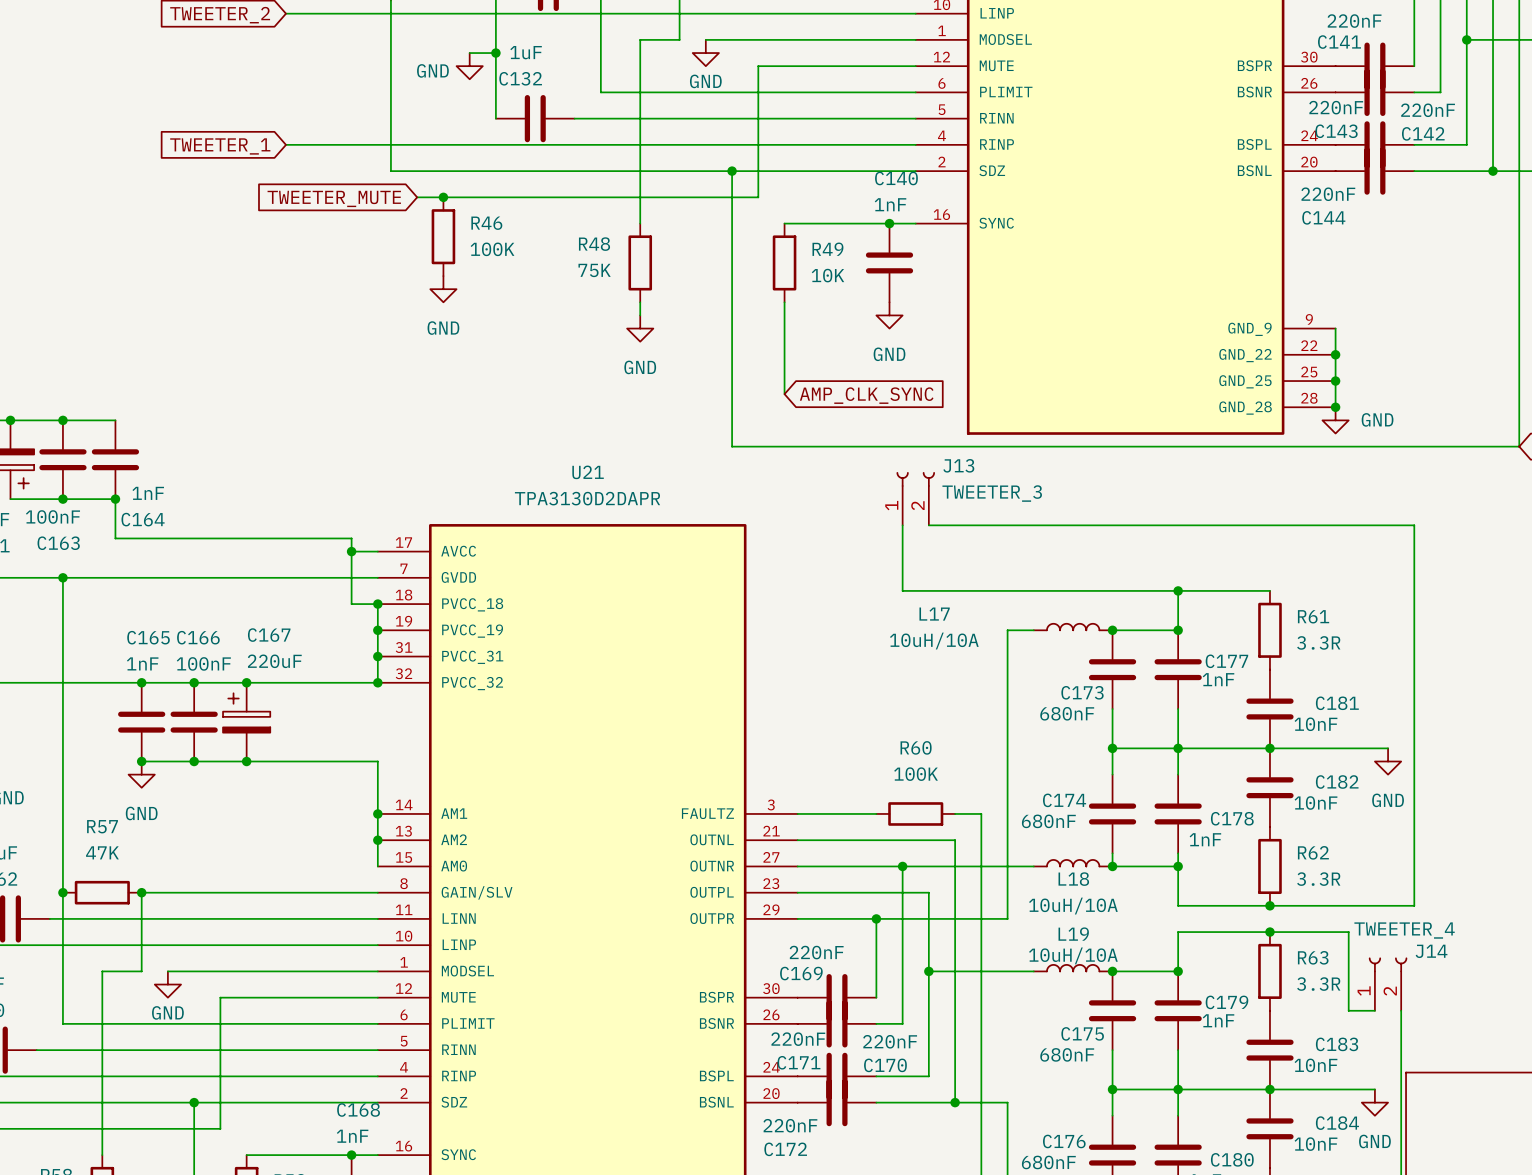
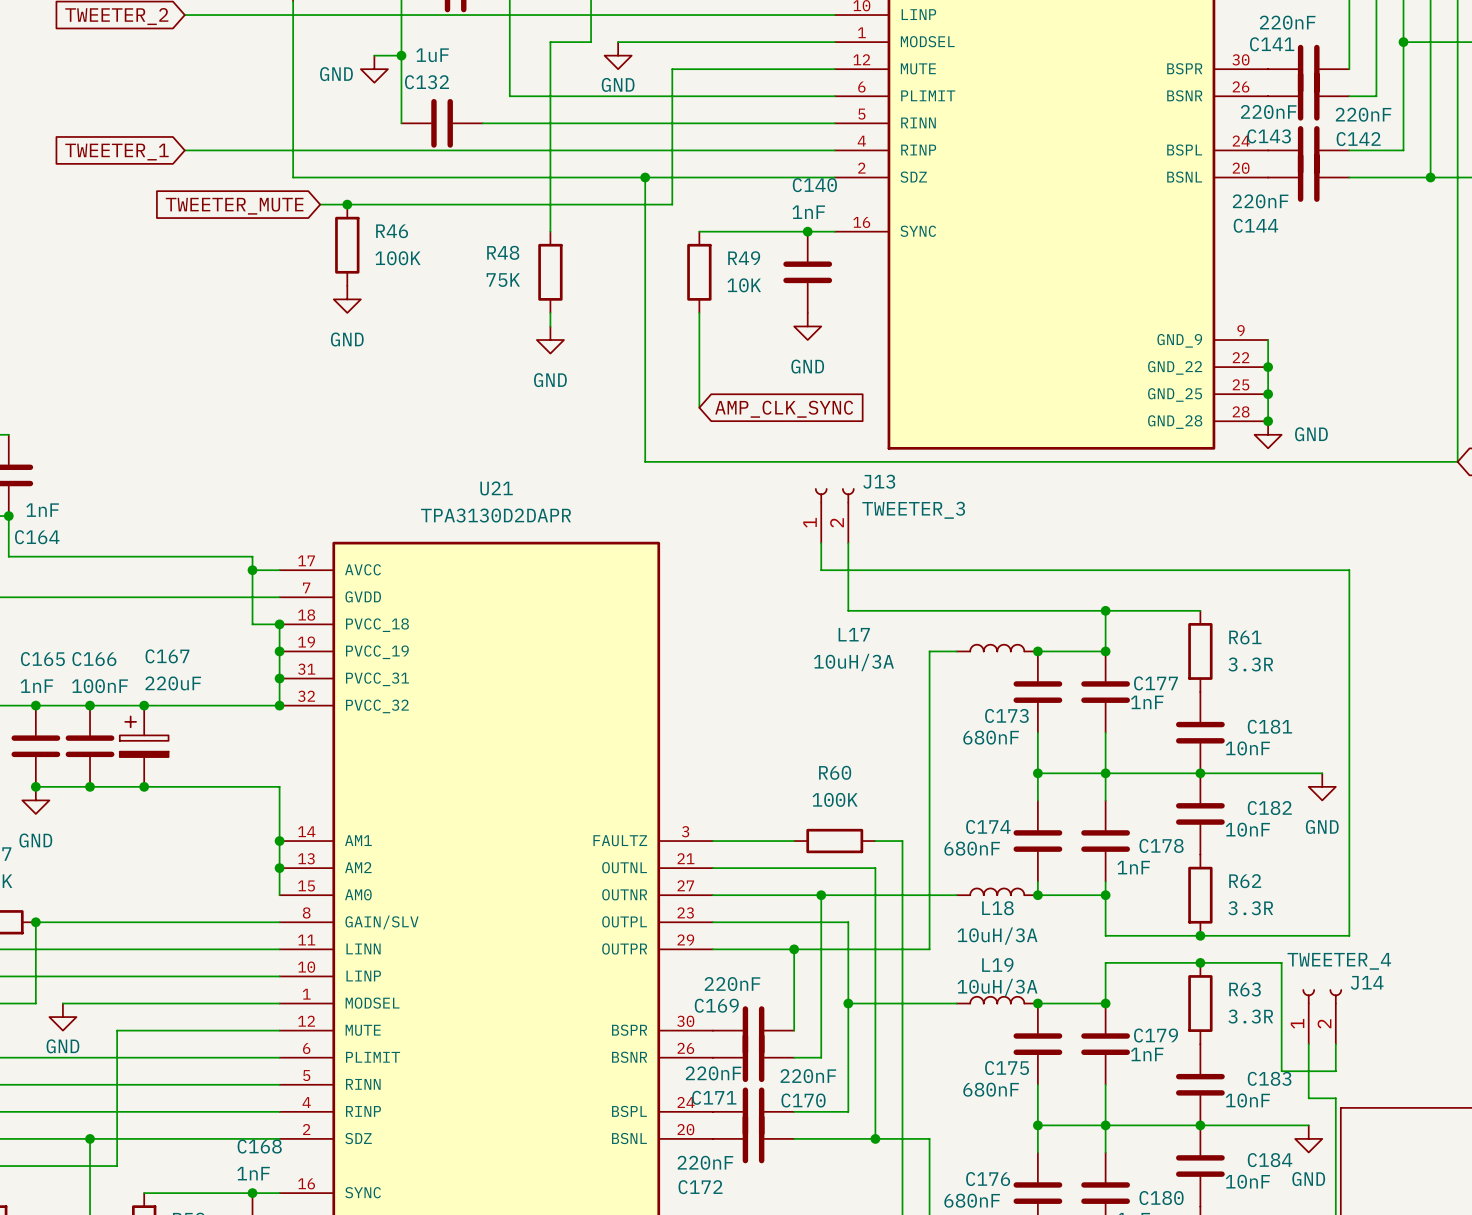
wire: (928, 525) (1414, 525) (1414, 551) -> (821, 570) (1349, 570)
wire: (902, 551) (902, 590) (928, 590) -> (848, 543) (848, 610)
L17 value: 10uH/10A (934, 641) -> 10uH/3A (853, 662)
L18 value: 10uH/10A (1073, 906) -> 10uH/3A (997, 936)
L19 value: 10uH/10A (1073, 955) -> 10uH/3A (997, 987)
wire: (1348, 1010) (1374, 1010) -> (1281, 1044) (1281, 1071) (1335, 1071)
wire: (1401, 1037) (1401, 1063) -> (1308, 1044) (1308, 1098) (1335, 1098)

